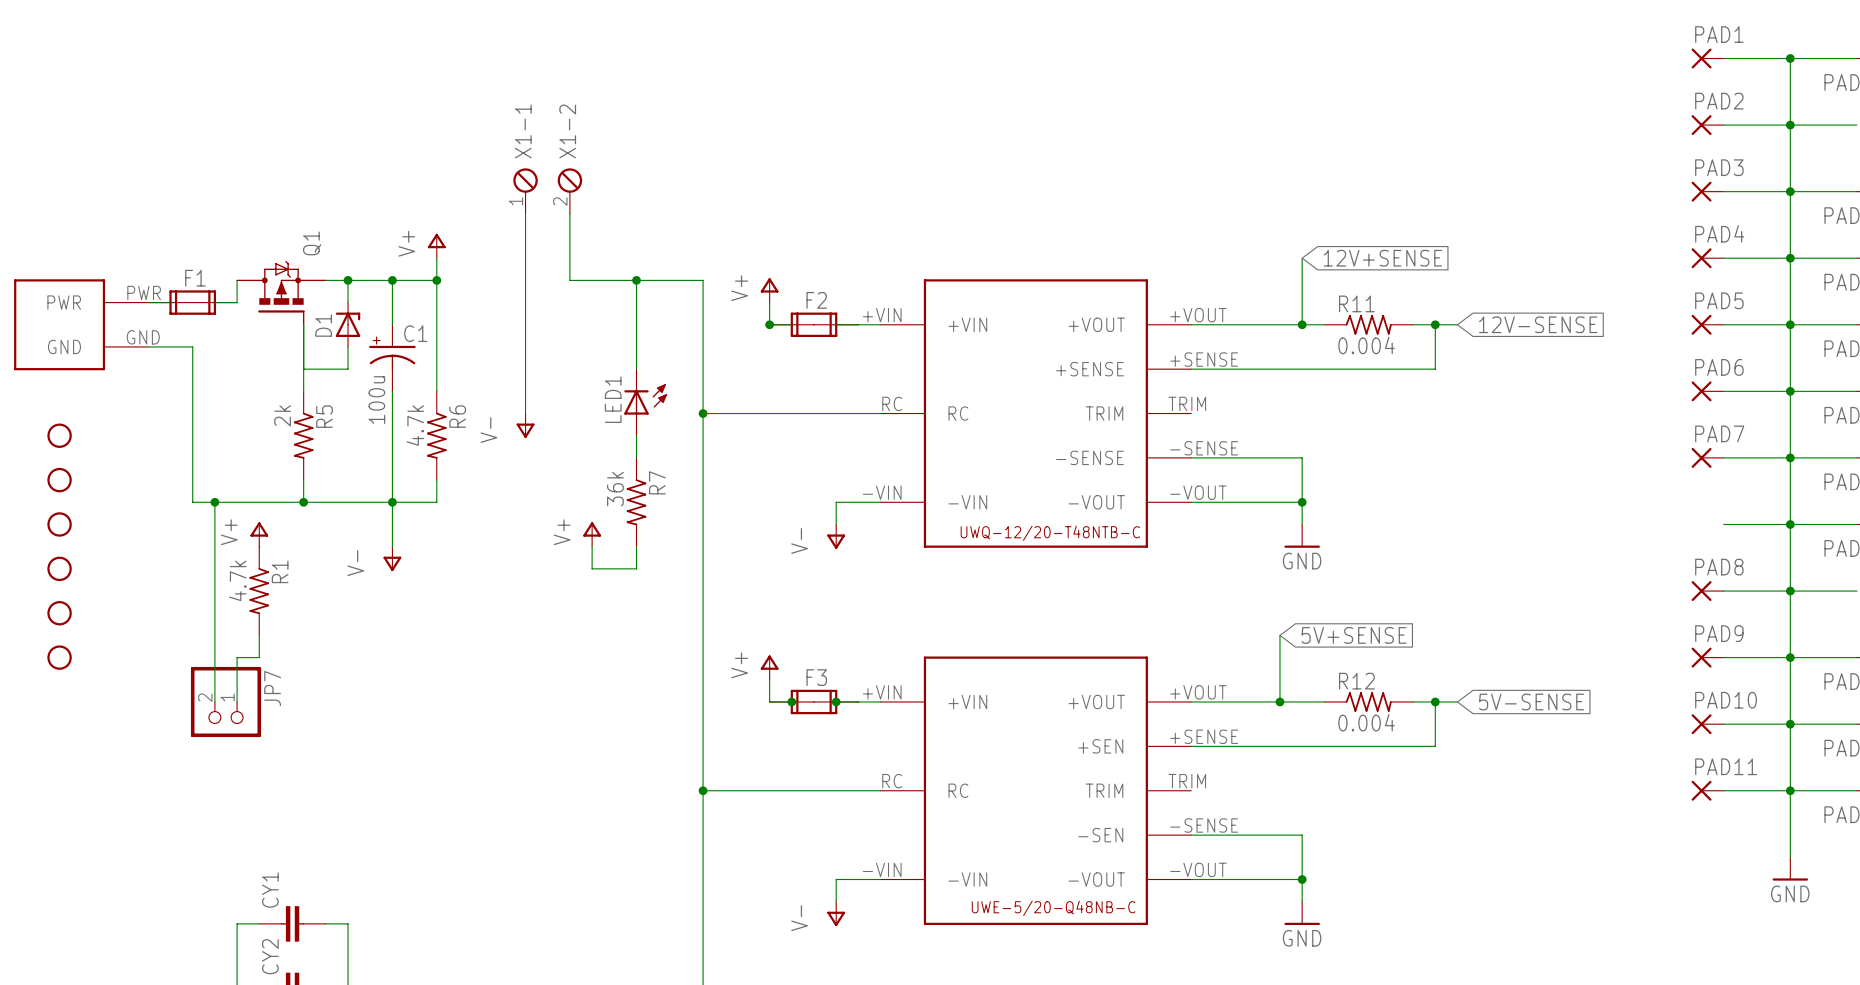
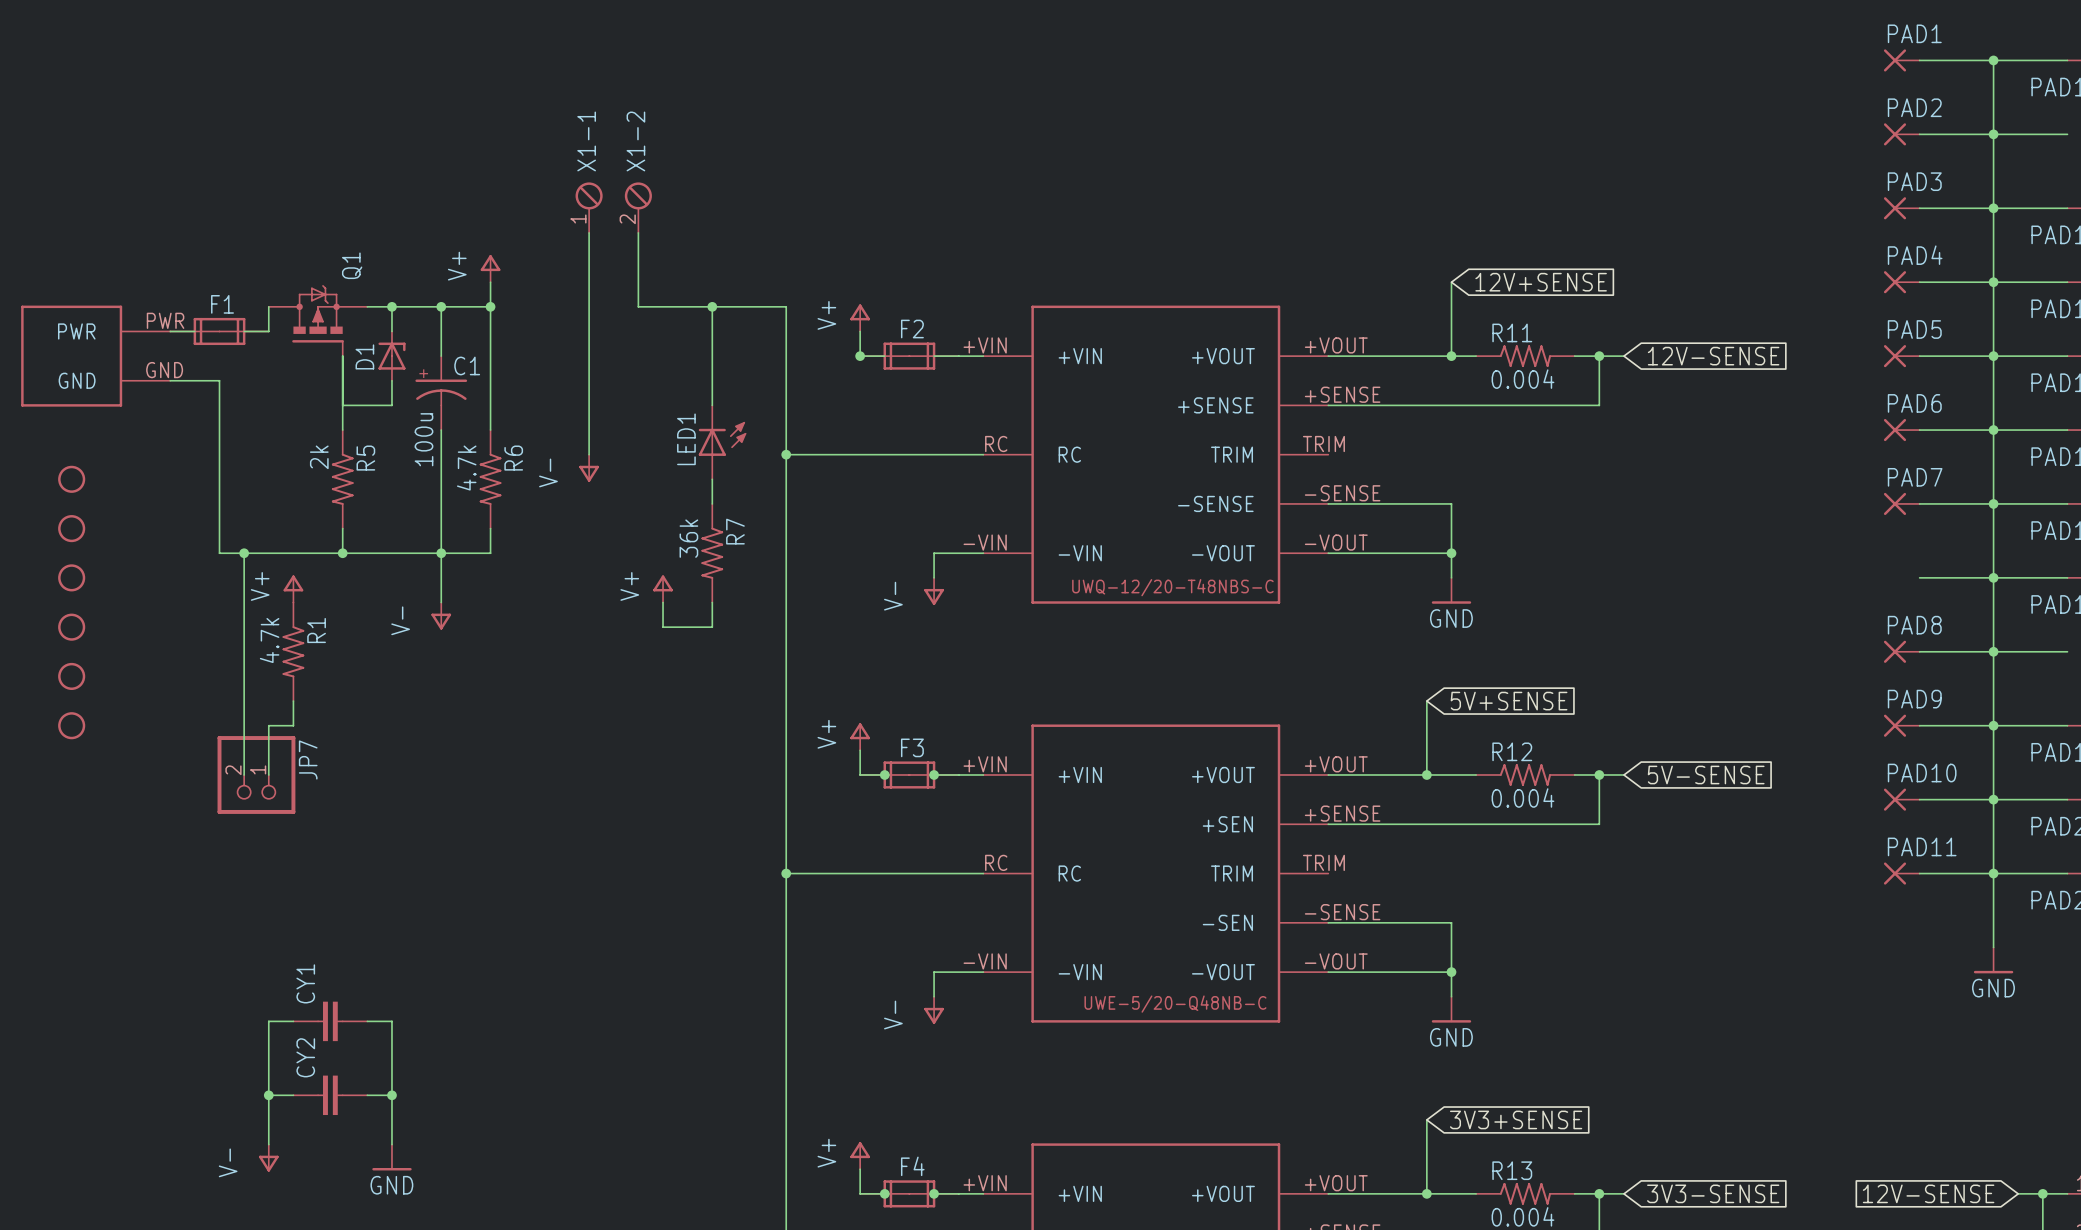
part text: UWQ-12/20-T48NTB-C (1050, 533) -> UWQ-12/20-T48NBS-C (1172, 587)

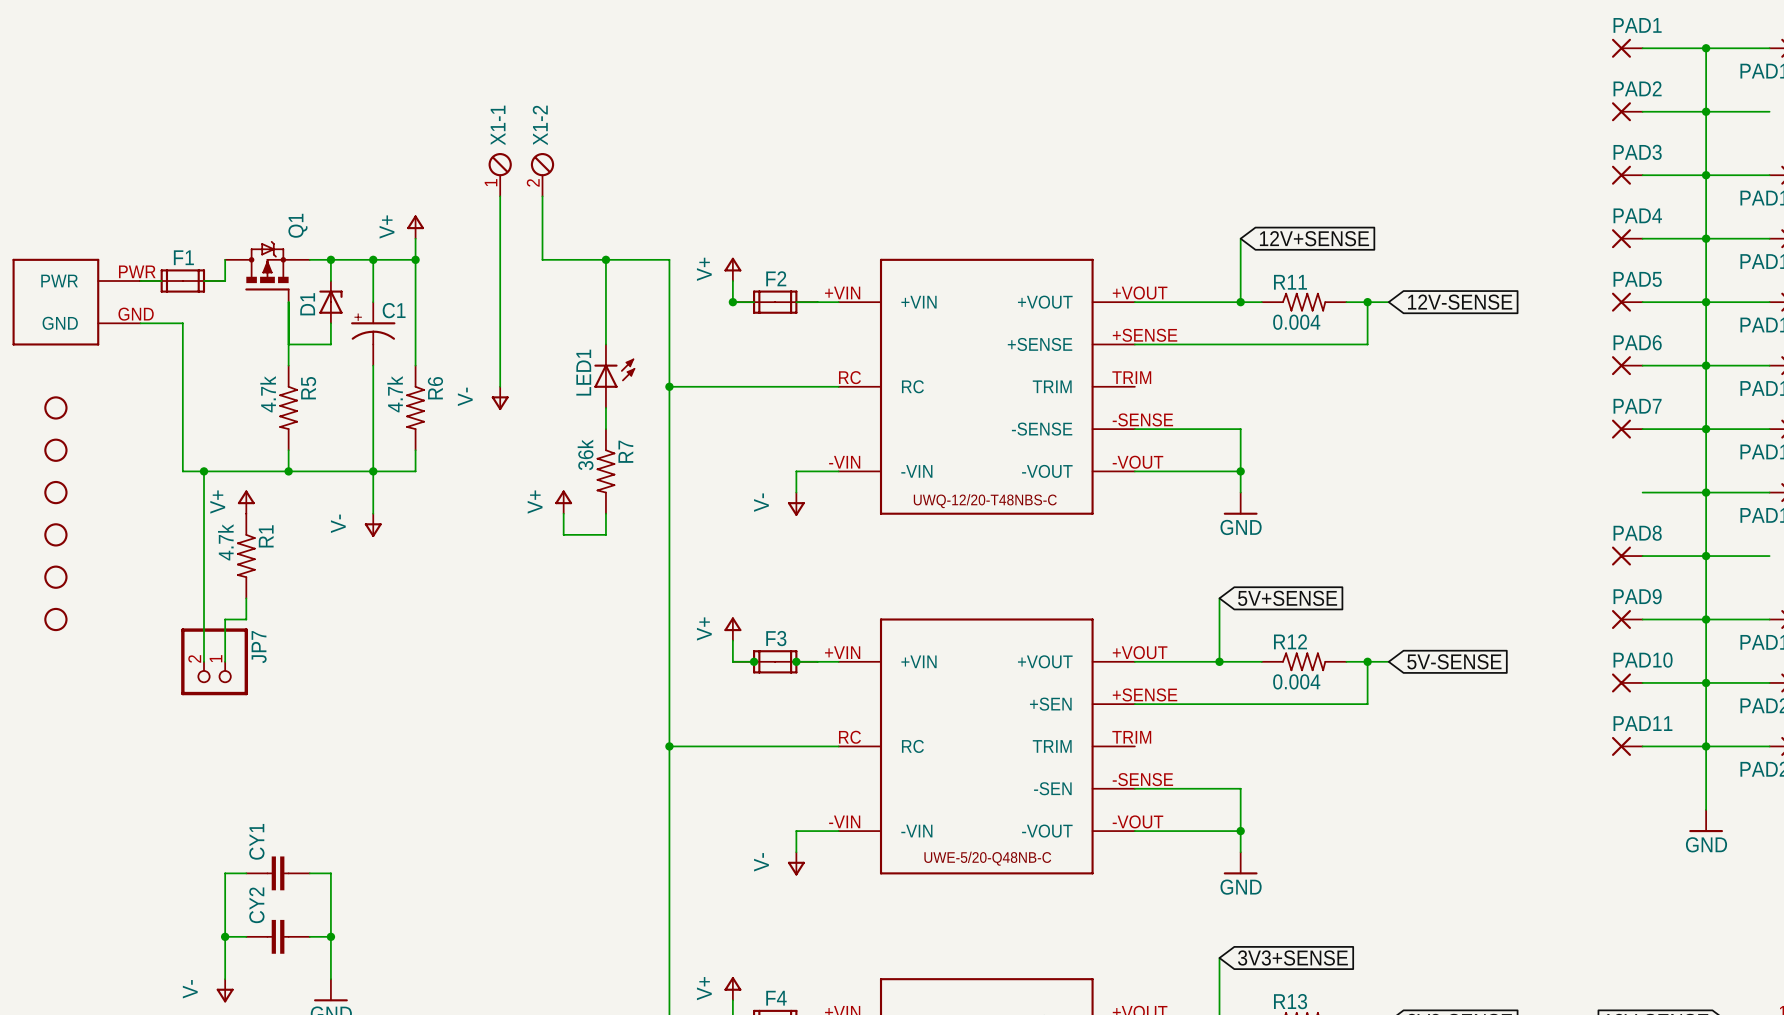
C1 value: 100u (424, 439) -> none
R5 value: 2k (319, 457) -> 4.7k (268, 394)

